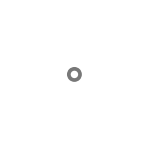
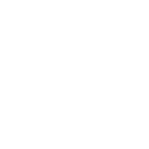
via: (74, 74) -> none

